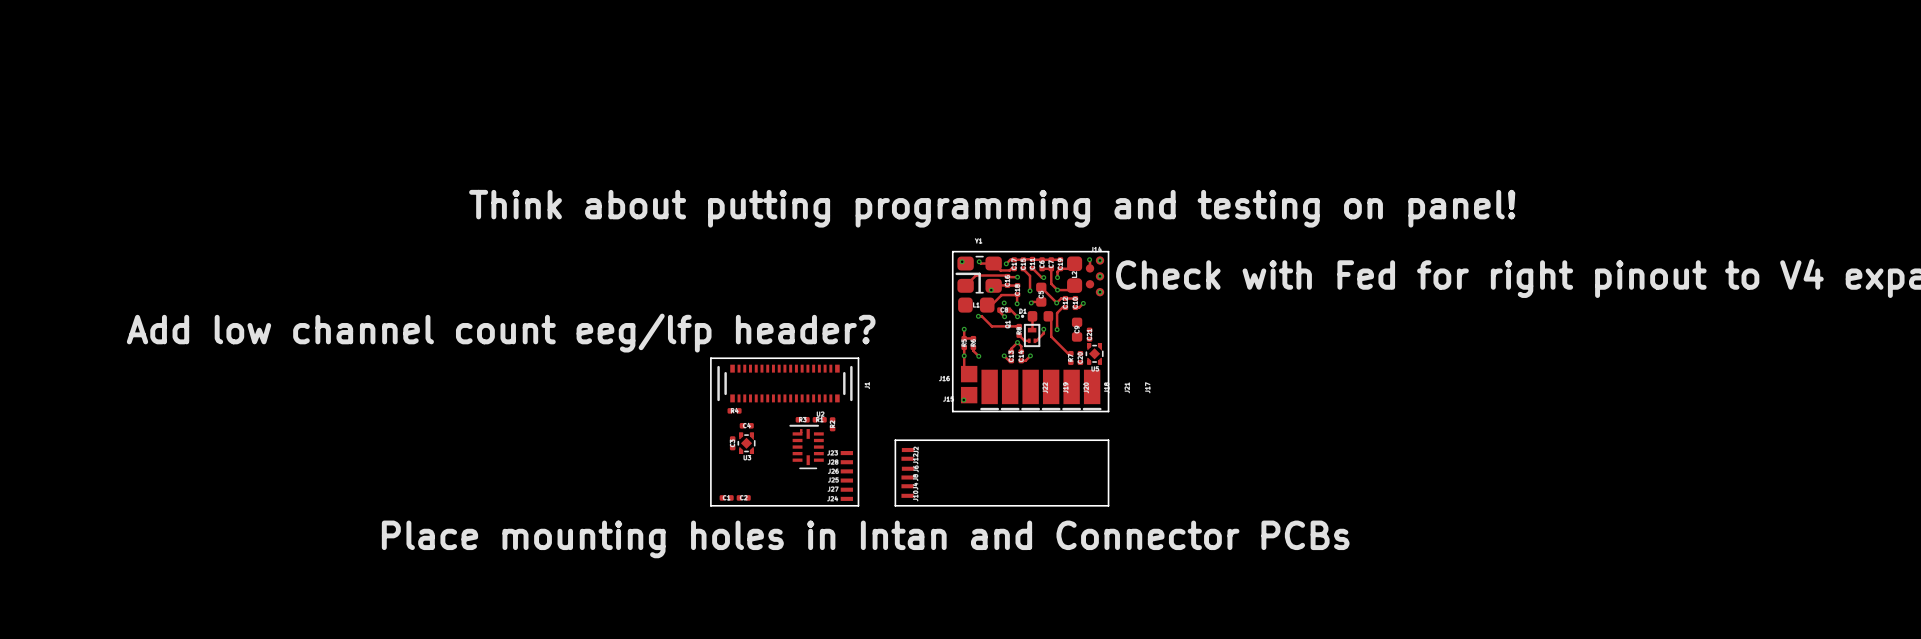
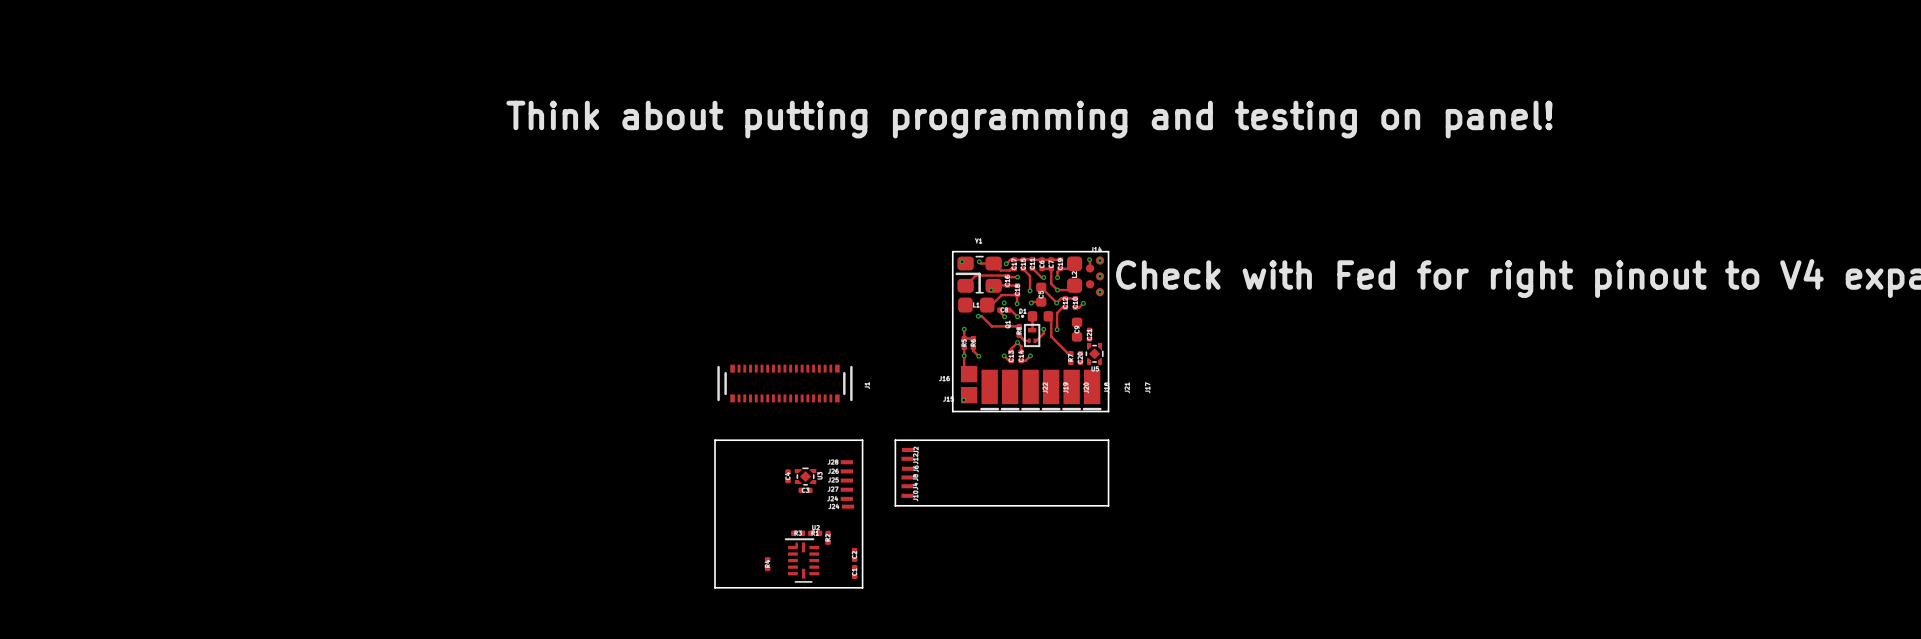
text position: Think about putting programming and testing on panel! (992, 208) -> Think about putting programming and testing on panel! (1029, 119)
text: Add low channel count eeg/lfp header? (501, 333) -> none
board edge: (710, 358) (710, 505) (858, 505) (858, 358) (710, 358) -> (715, 440) (715, 587) (862, 587) (862, 440) (715, 440)
part rotation: 0° (734, 410) -> 90° clockwise (767, 564)
part position: (734, 410) -> (767, 564)
part position: (802, 419) -> (798, 533)
part position: (819, 419) -> (815, 533)
part position: (832, 424) -> (828, 537)
part rotation: 0° (746, 425) -> 90° clockwise (788, 476)
part position: (746, 425) -> (788, 476)
part rotation: 0° (732, 443) -> 90° clockwise (805, 490)
part position: (732, 443) -> (805, 490)
part rotation: 0° (746, 443) -> 90° counterclockwise (805, 476)
part position: (746, 443) -> (805, 476)
part position: (806, 446) -> (801, 560)
part: (846, 453) -> none
part rotation: 0° (726, 497) -> 90° clockwise (854, 572)
part position: (726, 497) -> (854, 572)
part rotation: 0° (743, 497) -> 90° clockwise (854, 554)
part position: (743, 497) -> (854, 554)
part: none -> (848, 506)
text: Place mounting holes in Intan and Connector PCBs (865, 539) -> none

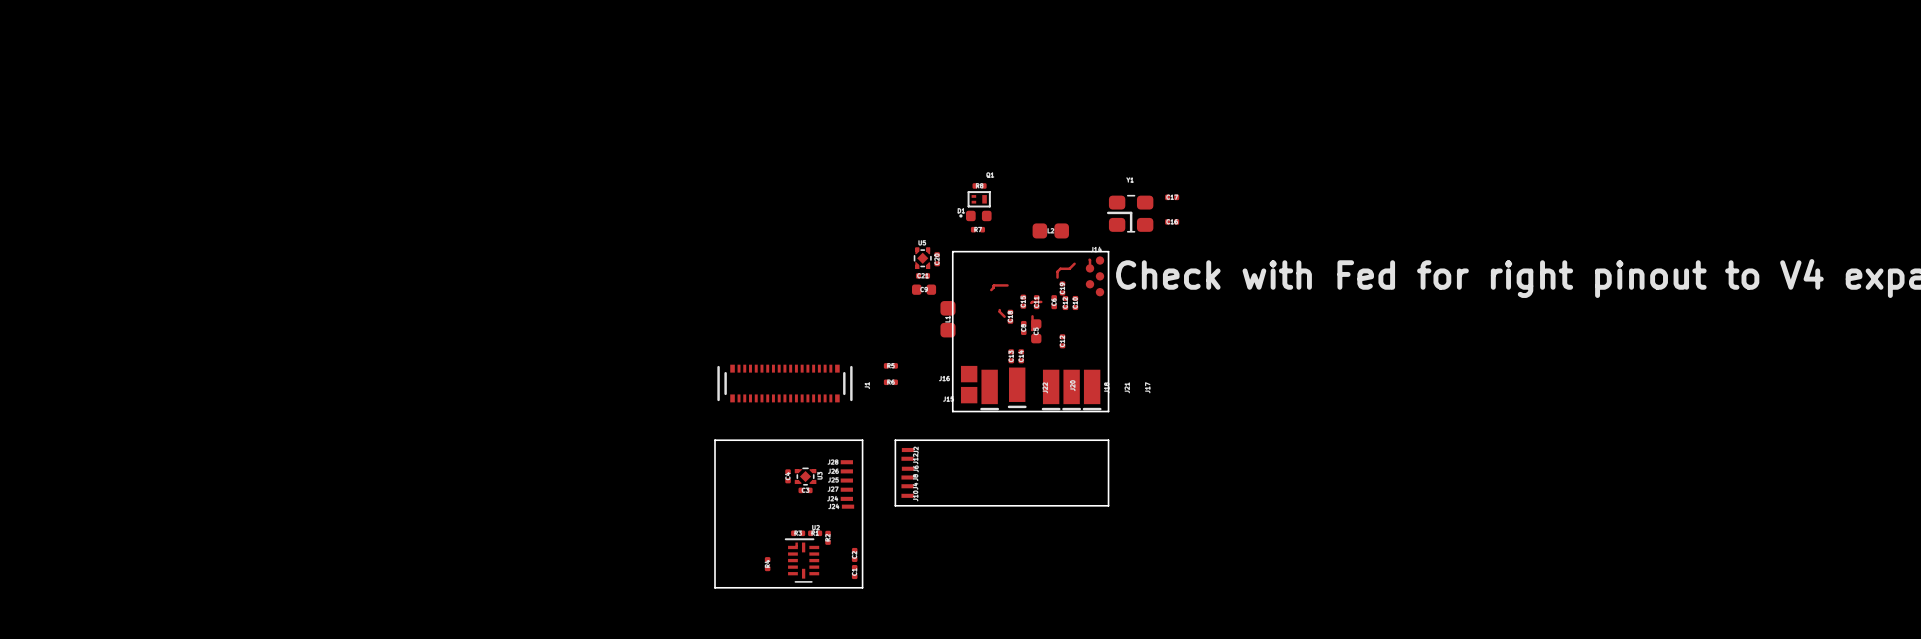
text: Think about putting programming and testing on panel! (1029, 119) -> none
track: (1060, 259) (1010, 259) (1006, 263) -> none
via: (1089, 259) -> none
via: (1100, 260) -> none
via: (962, 261) -> none
track: (979, 261) (980, 263) (993, 263) (1000, 270) (1014, 268) -> none
via: (979, 261) -> none
via: (1006, 263) -> none
part position: (1032, 263) -> (1036, 302)
part rotation: 0° (1014, 264) -> 90° clockwise (1172, 197)
part position: (1014, 264) -> (1172, 197)
part position: (1023, 264) -> (1023, 301)
part position: (1042, 264) -> (1054, 302)
part: (1051, 264) -> none
part position: (1060, 264) -> (1062, 288)
track: (1023, 268) (1030, 275) (1030, 290) -> none
track: (1032, 268) (1043, 277) -> none
track: (1042, 268) (1051, 268) (1051, 283) (1057, 290) (1070, 290) (1074, 285) -> none
part position: (978, 274) -> (1130, 213)
part rotation: 0° (1074, 274) -> 90° clockwise (1050, 230)
part position: (1074, 274) -> (1050, 230)
via: (1100, 276) -> none
track: (1017, 277) (975, 275) (965, 285) -> none
via: (1017, 277) -> none
via: (1043, 277) -> none
via: (1057, 277) -> none
part rotation: 0° (1007, 280) -> 90° clockwise (1172, 221)
part position: (1007, 280) -> (1172, 221)
track: (1007, 285) (1017, 285) -> none
track: (1041, 287) (1056, 302) -> none
via: (991, 290) -> none
part position: (1017, 290) -> (1010, 316)
via: (1030, 290) -> none
via: (1057, 290) -> none
via: (1100, 292) -> none
track: (1017, 294) (1001, 295) (991, 305) (987, 305) -> none
part position: (1041, 294) -> (1036, 331)
track: (1017, 295) (1017, 303) -> none
track: (1075, 298) (1061, 298) (1056, 302) -> none
via: (1004, 302) -> none
via: (1031, 302) -> none
via: (1056, 302) -> none
via: (1017, 303) -> none
track: (1083, 303) (1079, 307) (1075, 307) -> none
via: (1083, 303) -> none
part rotation: 0° (976, 305) -> 90° clockwise (947, 319)
part position: (976, 305) -> (947, 319)
track: (1065, 307) (1062, 307) (1057, 313) (1057, 329) -> none
part rotation: 0° (1004, 310) -> 90° clockwise (1023, 327)
part position: (1004, 310) -> (1023, 327)
track: (1008, 310) (1017, 316) -> none
track: (978, 316) (981, 316) (991, 326) (1019, 326) -> none
via: (978, 316) -> none
via: (1004, 316) -> none
via: (1017, 316) -> none
part position: (1037, 316) -> (975, 215)
track: (1048, 316) (1051, 319) (1051, 336) (1068, 353) (1070, 353) -> none
track: (964, 329) (964, 338) (973, 338) -> none
via: (964, 329) -> none
track: (1043, 329) (1043, 333) (1034, 340) -> none
via: (1043, 329) -> none
via: (1057, 329) -> none
part rotation: 0° (1077, 329) -> 90° clockwise (924, 289)
part position: (1077, 329) -> (924, 289)
part rotation: 0° (1019, 330) -> 90° clockwise (979, 185)
part position: (1019, 330) -> (979, 185)
part rotation: 0° (1089, 334) -> 90° clockwise (922, 275)
part position: (1089, 334) -> (922, 275)
track: (1019, 335) (1024, 340) (1029, 340) -> none
part rotation: 0° (1032, 335) -> 90° clockwise (979, 199)
part position: (1032, 335) -> (979, 199)
part: none -> (1062, 341)
part rotation: 0° (964, 342) -> 90° clockwise (890, 365)
part position: (964, 342) -> (890, 365)
part rotation: 0° (973, 342) -> 90° clockwise (890, 382)
part position: (973, 342) -> (890, 382)
via: (1017, 342) -> none
track: (973, 347) (973, 350) (978, 356) -> none
track: (964, 348) (964, 369) (969, 374) -> none
track: (1011, 351) (1011, 348) (1017, 342) (1021, 346) (1021, 351) -> none
part rotation: 0° (1094, 353) -> 180° (922, 258)
part position: (1094, 353) -> (922, 258)
via: (964, 355) -> none
track: (1004, 355) (1011, 360) -> none
via: (1004, 355) -> none
track: (1030, 355) (1025, 360) (1021, 360) -> none
via: (1030, 355) -> none
via: (978, 356) -> none
part rotation: 0° (1070, 357) -> 90° clockwise (977, 229)
part position: (1070, 357) -> (977, 229)
part position: (1080, 357) -> (937, 259)
part: (1010, 390) -> none
part position: (1030, 390) -> (1017, 387)
via: (963, 400) -> none

